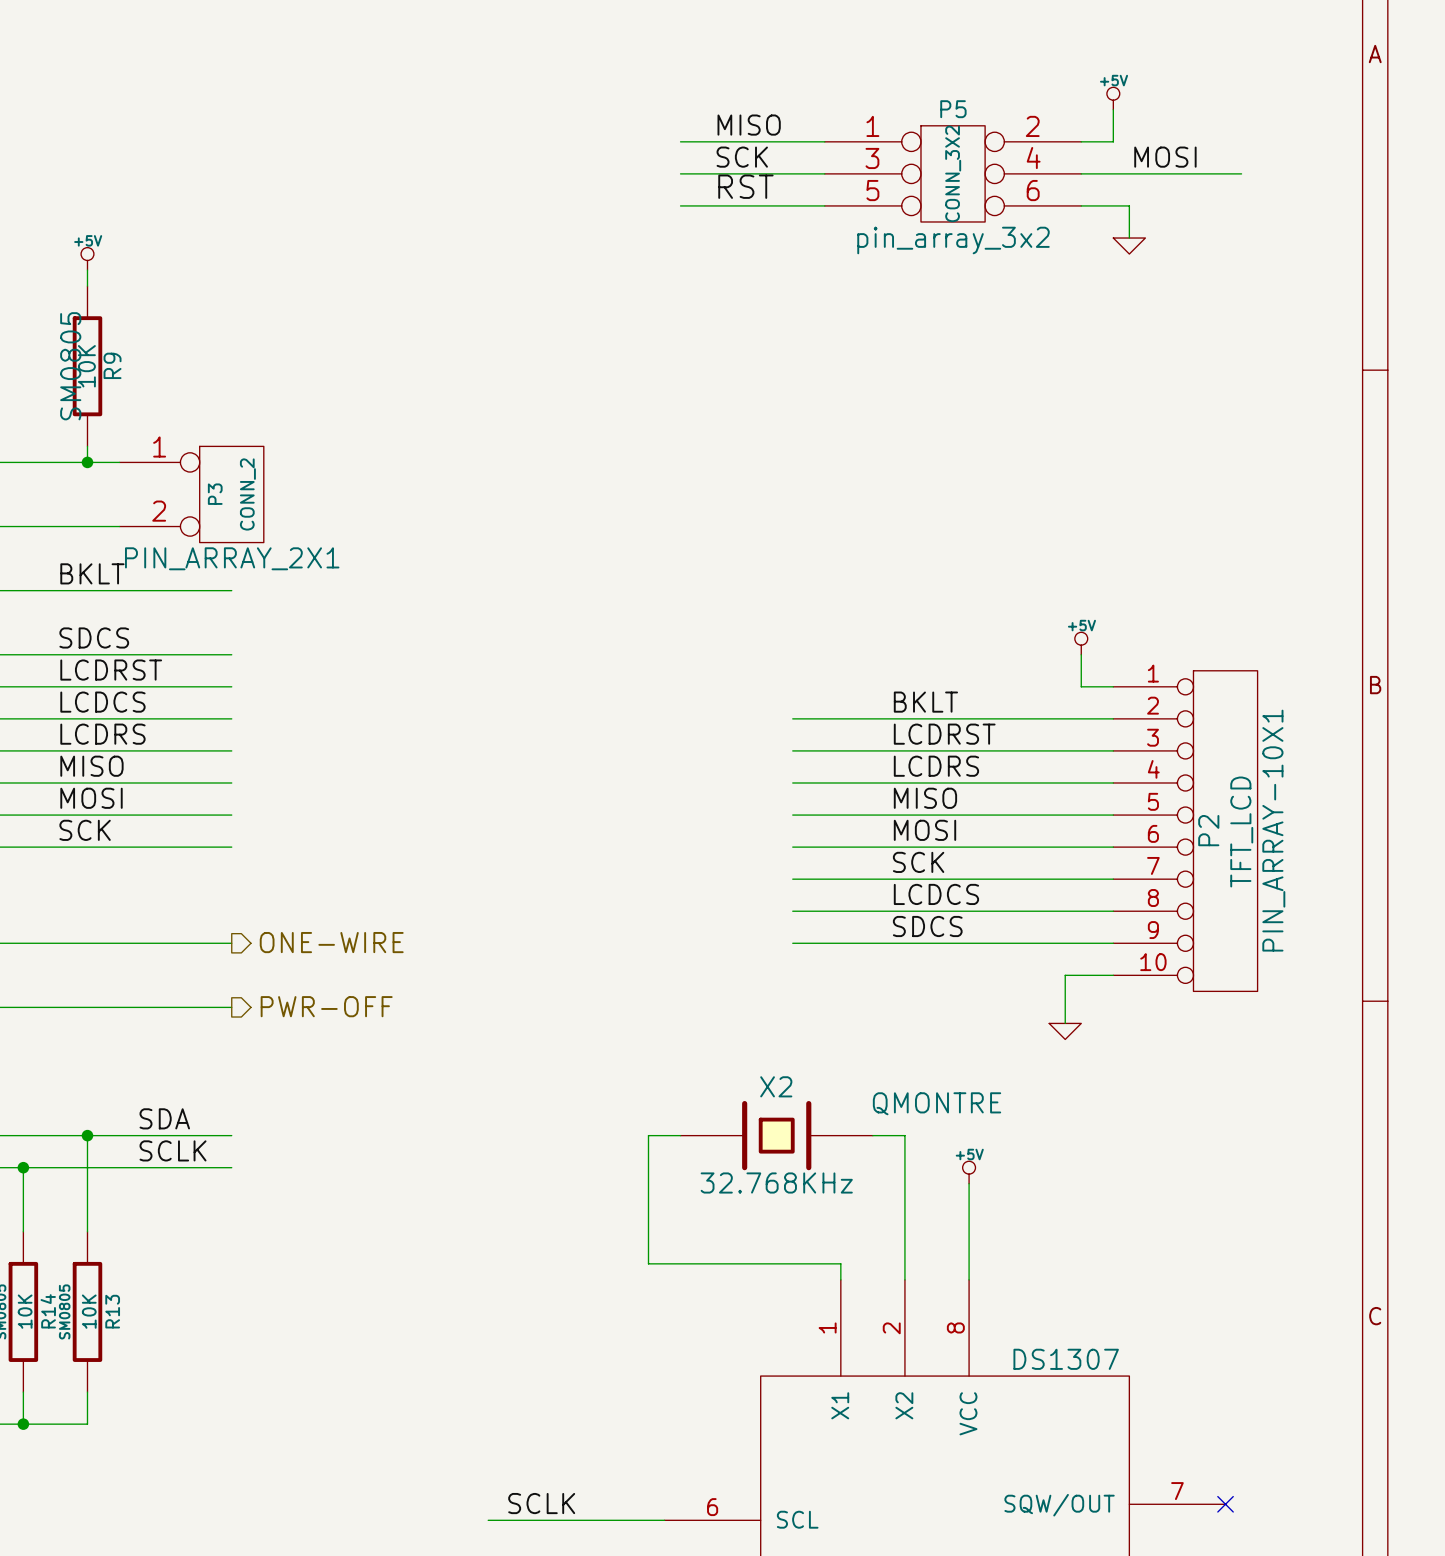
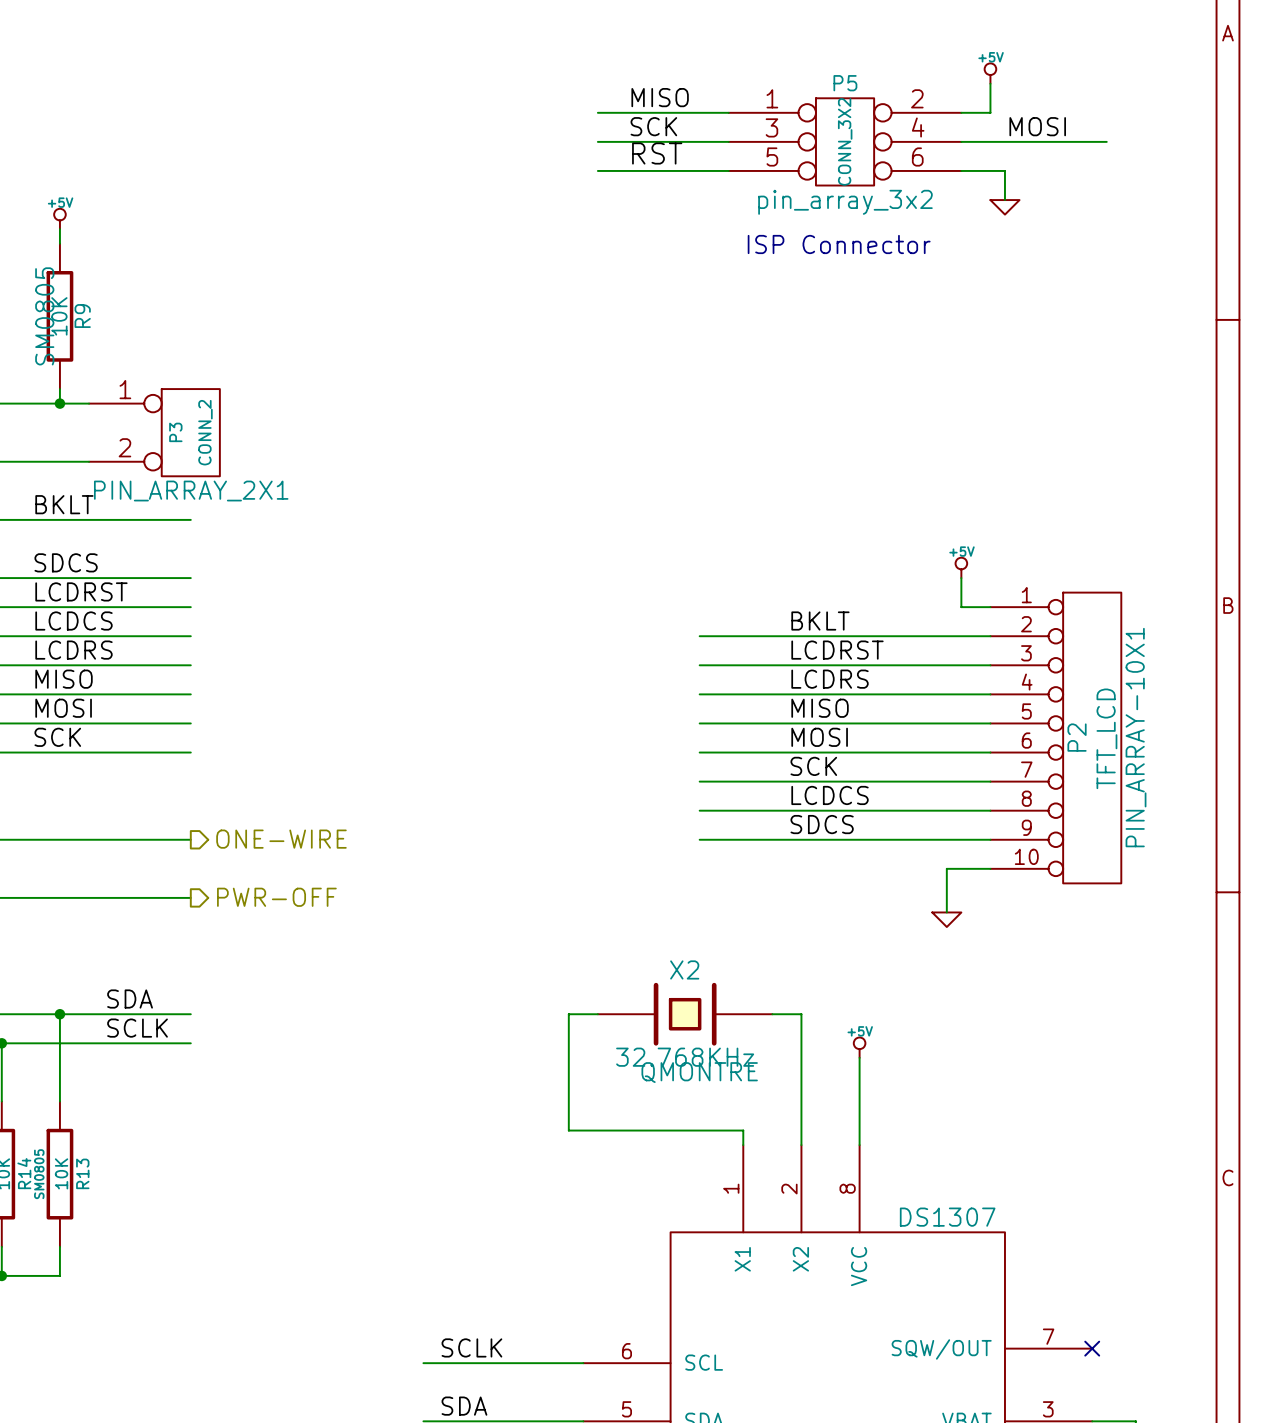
text: none -> ISP Connector (839, 244)
X2 text position: QMONTRE (937, 1103) -> QMONTRE (699, 1072)

